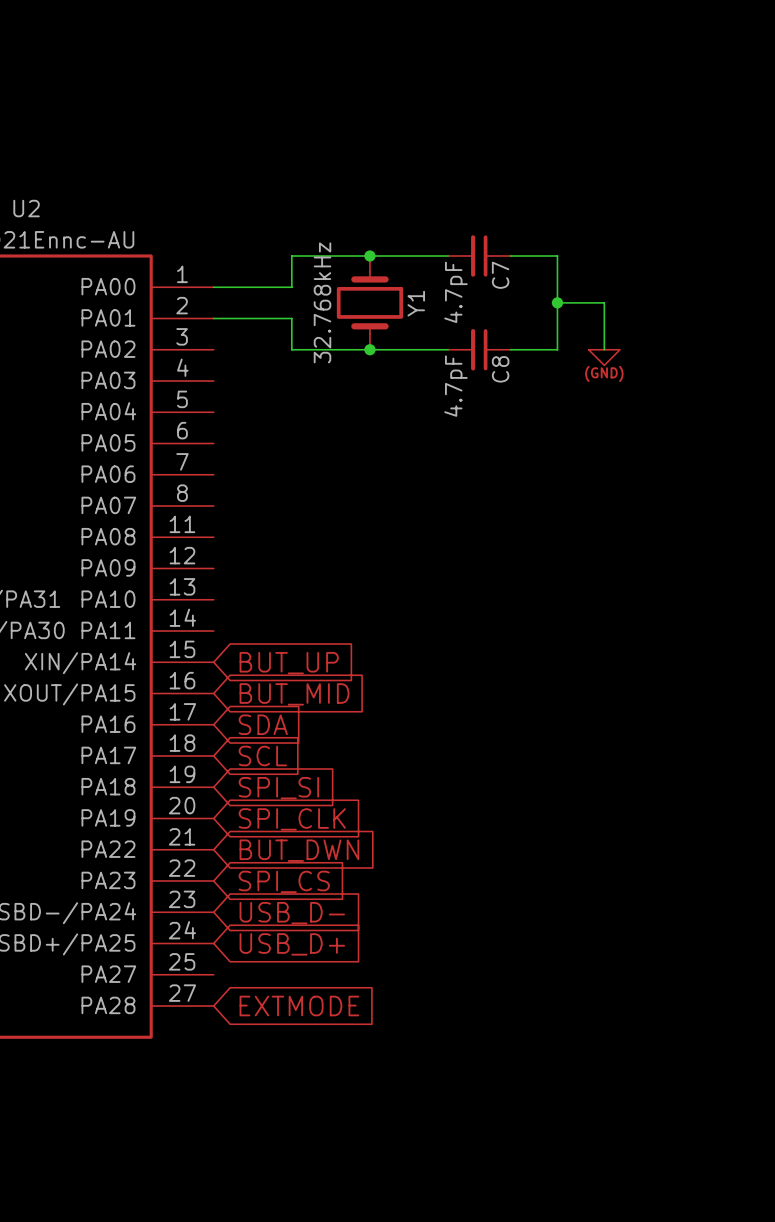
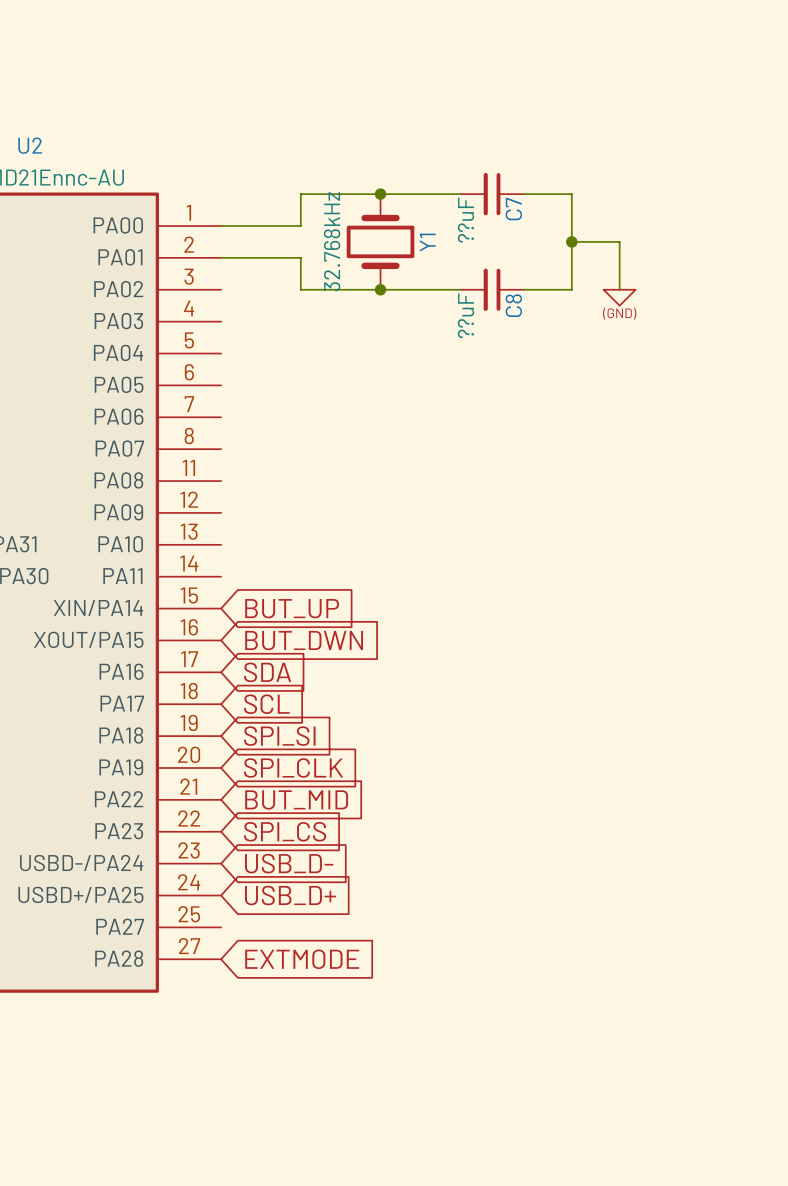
C7 value: 4.7pF (455, 292) -> ??uF (465, 220)
C8 value: 4.7pF (455, 386) -> ??uF (465, 315)
global label: BUT_MID (294, 694) -> BUT_DWN (304, 640)
global label: BUT_DWN (299, 850) -> BUT_MID (296, 799)

